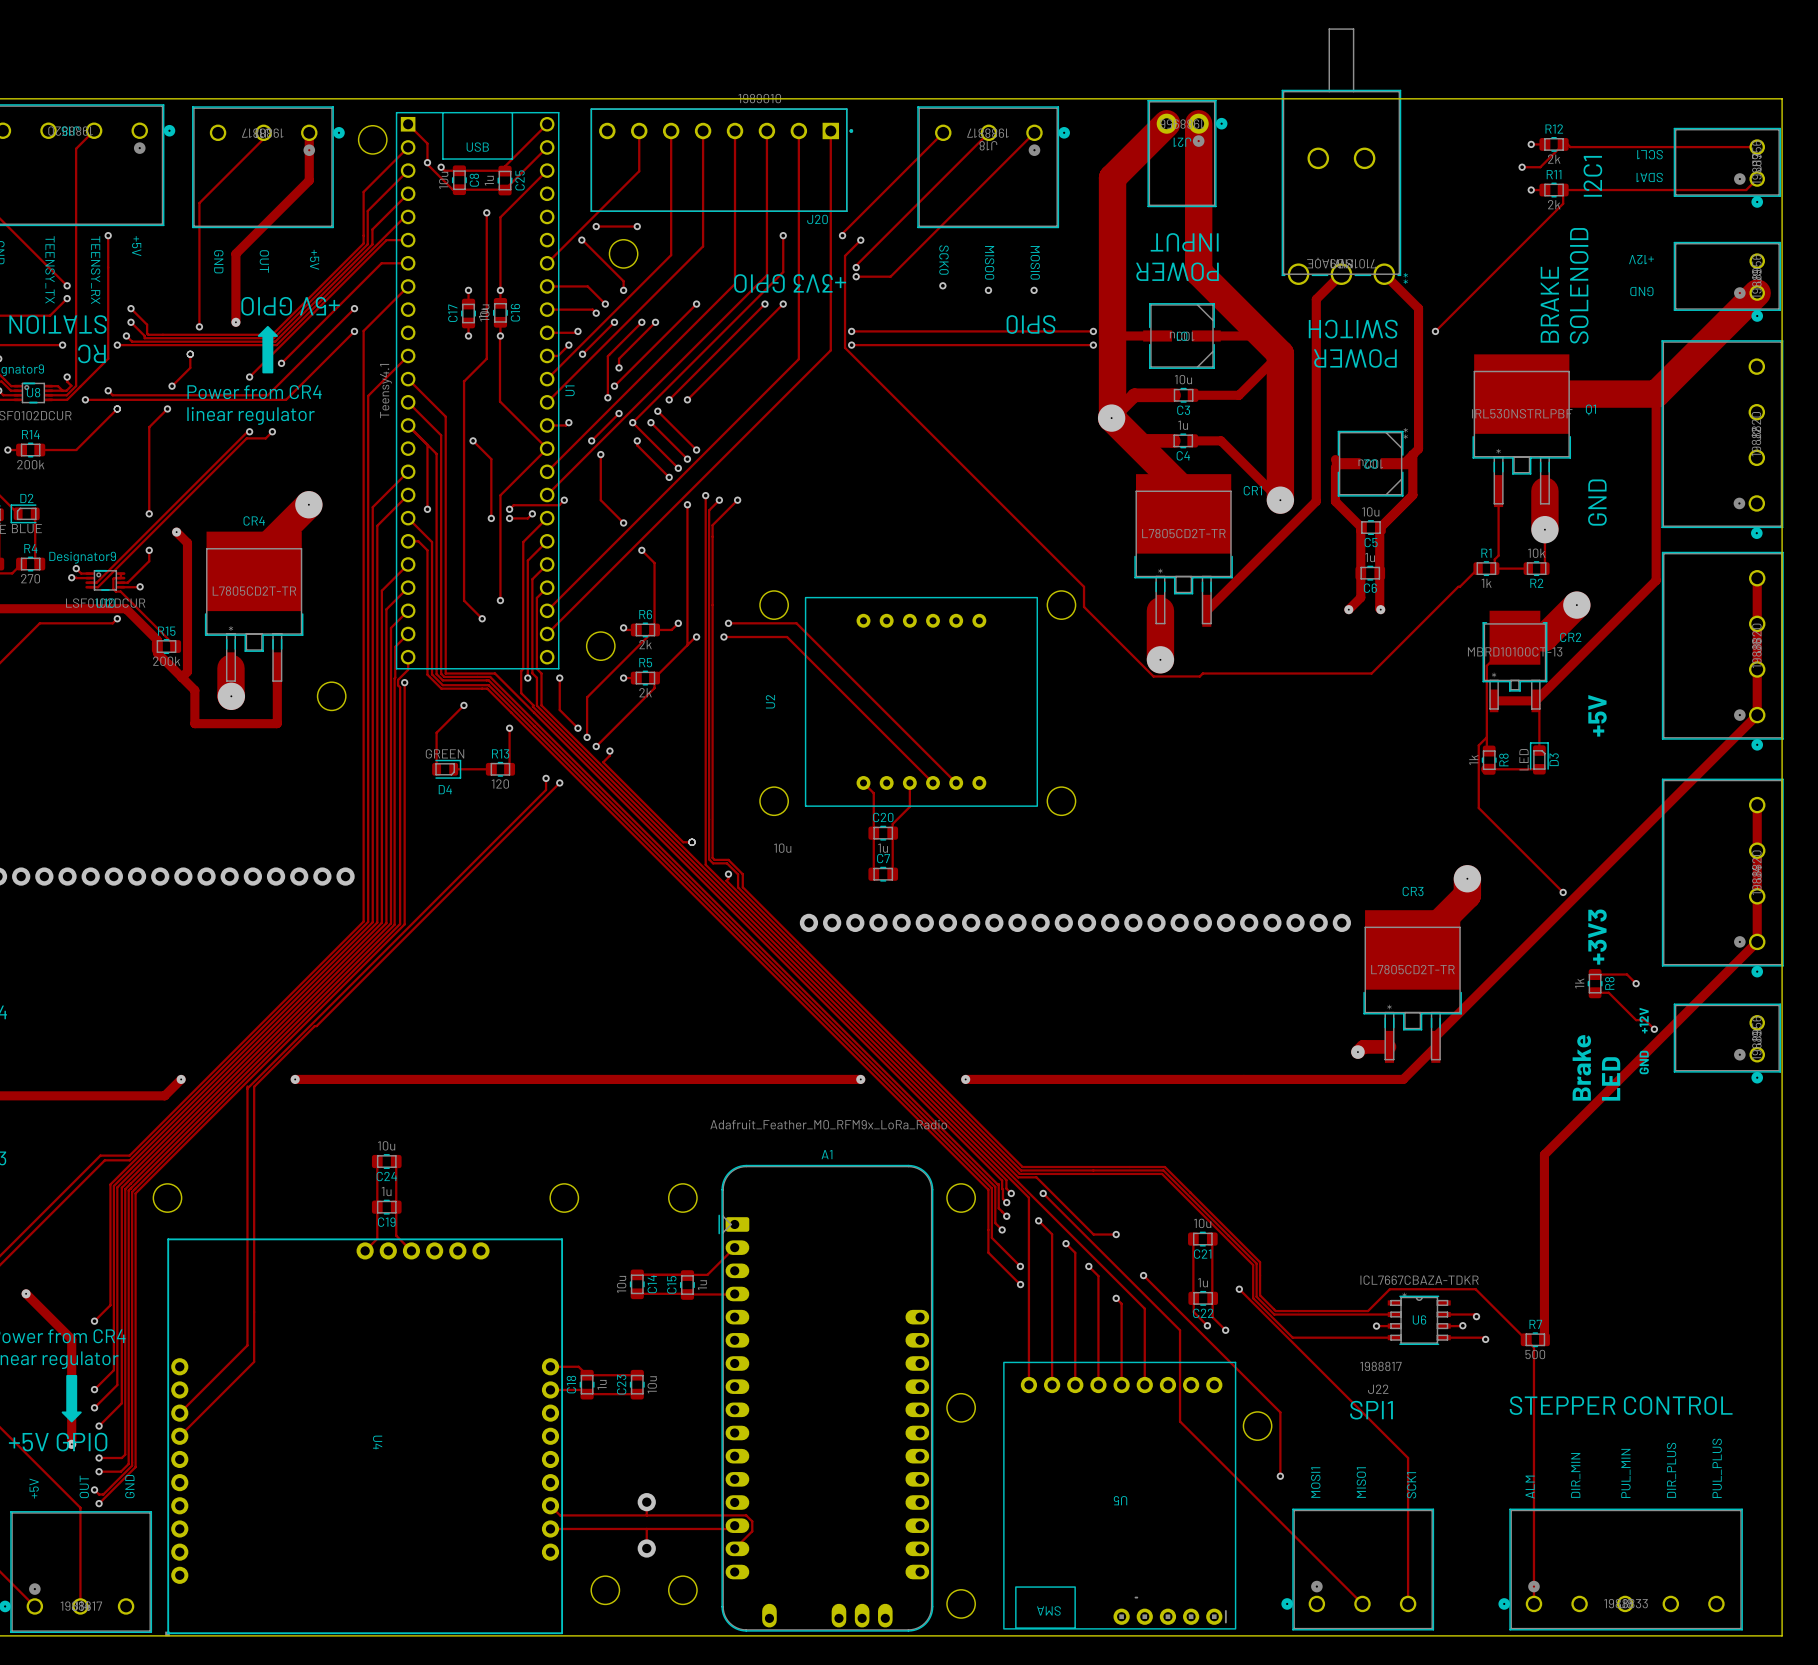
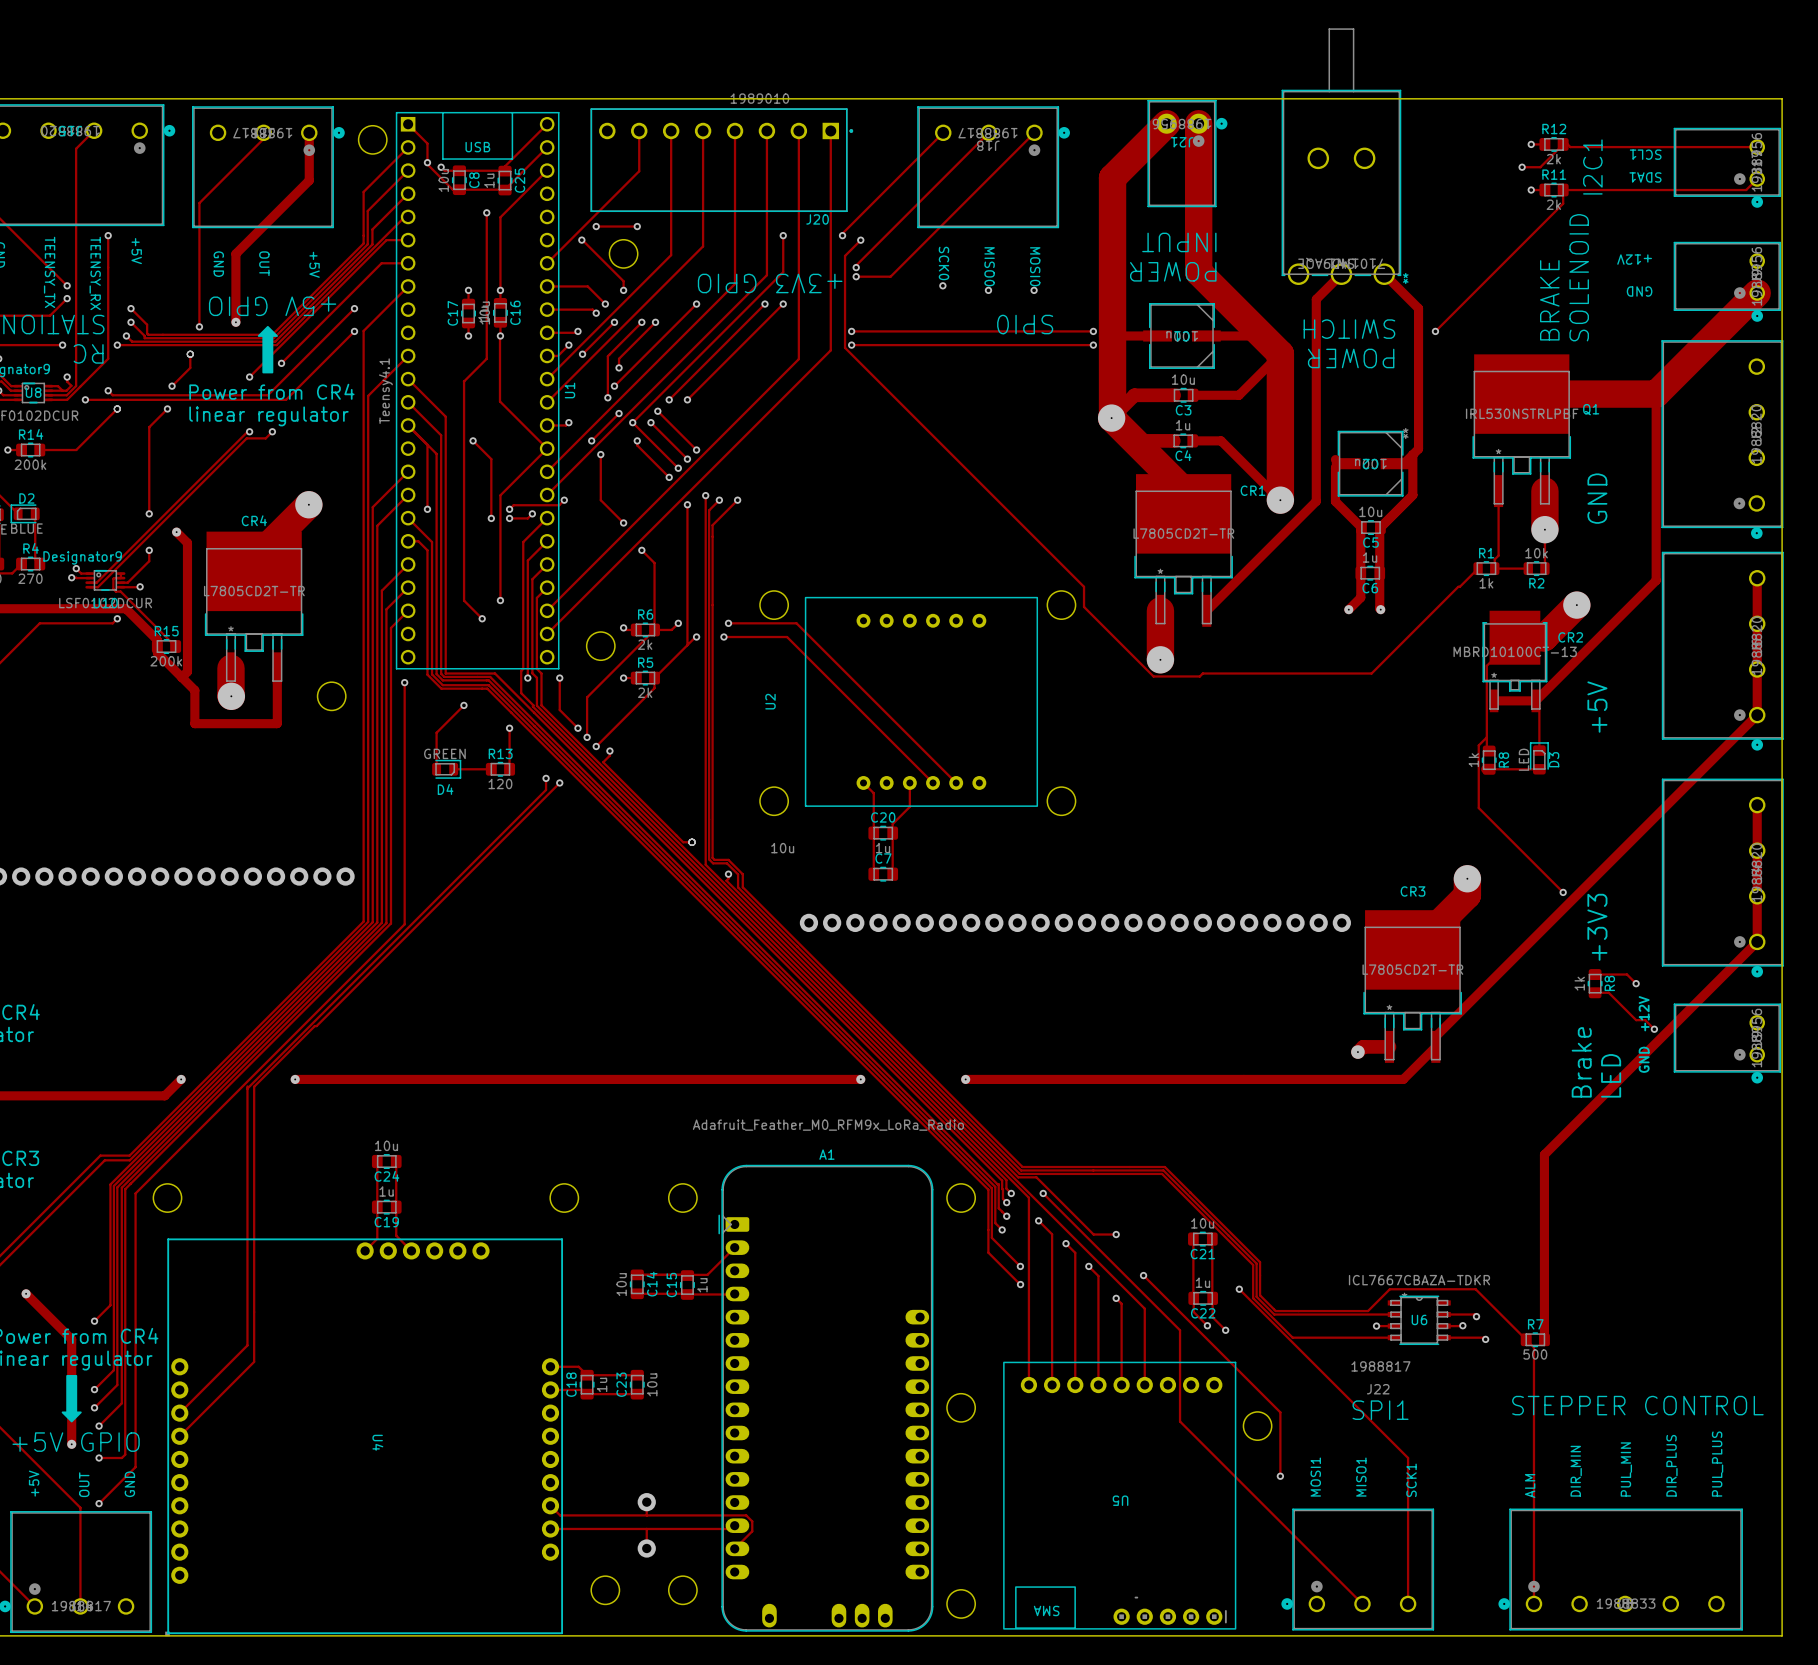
track: (408, 634) (395, 646) (394, 924) (128, 1190) (128, 1463) (120, 1471) (99, 1471) -> none
track: (408, 657) (408, 669) (398, 679) (400, 687) (400, 924) (132, 1192) (132, 1465) (103, 1494) (99, 1494) (94, 1489) -> none
via: (99, 1471) -> none
via: (94, 1489) -> none

